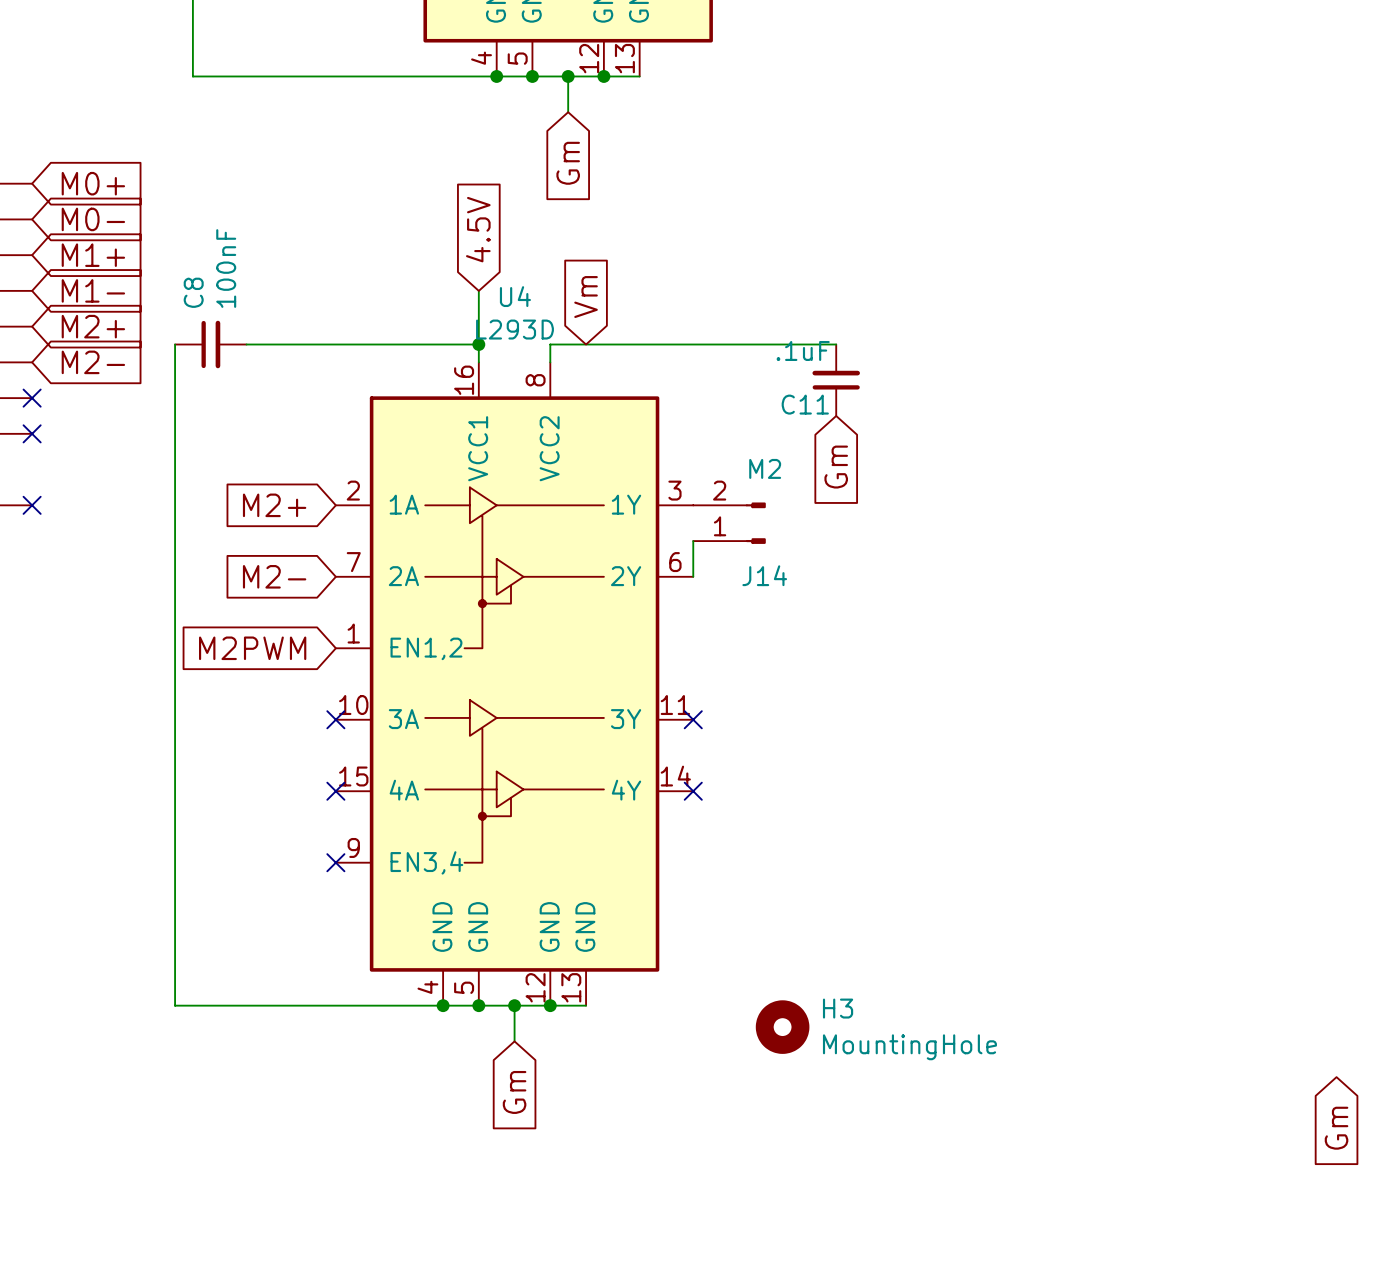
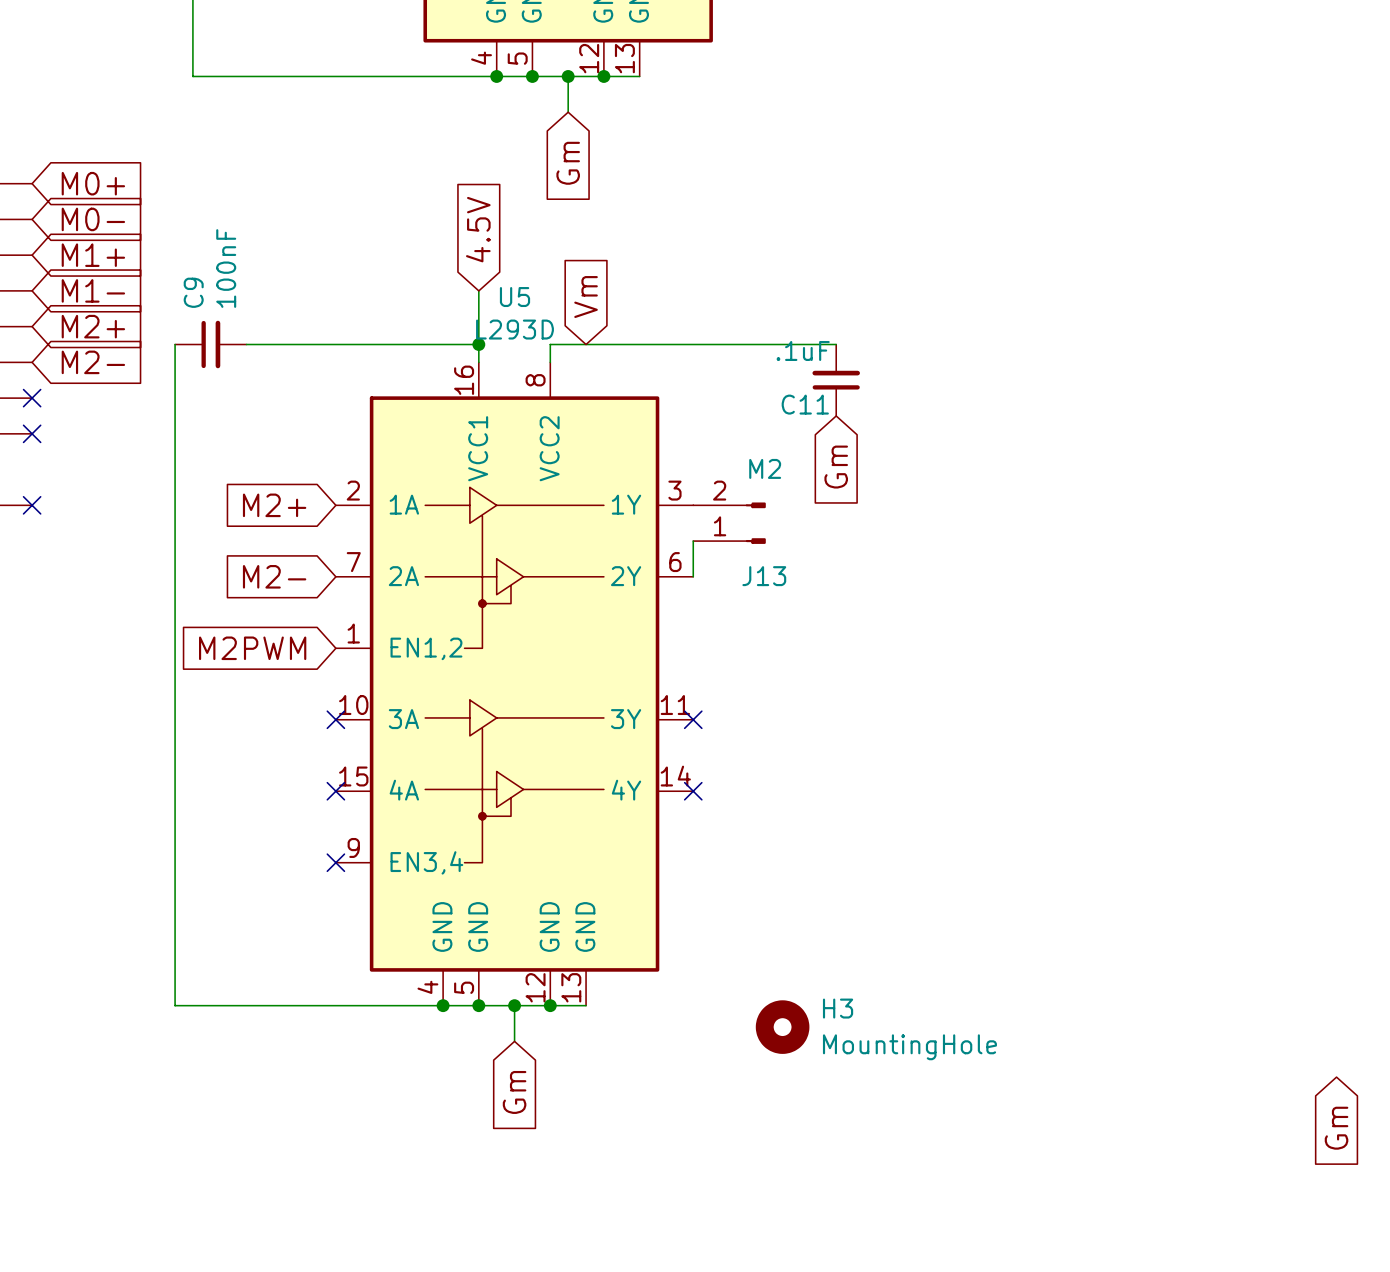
C8 name: C8 (193, 292) -> C9 (193, 292)
U4 name: U4 (515, 296) -> U5 (514, 297)
J14 name: J14 (764, 575) -> J13 (764, 576)

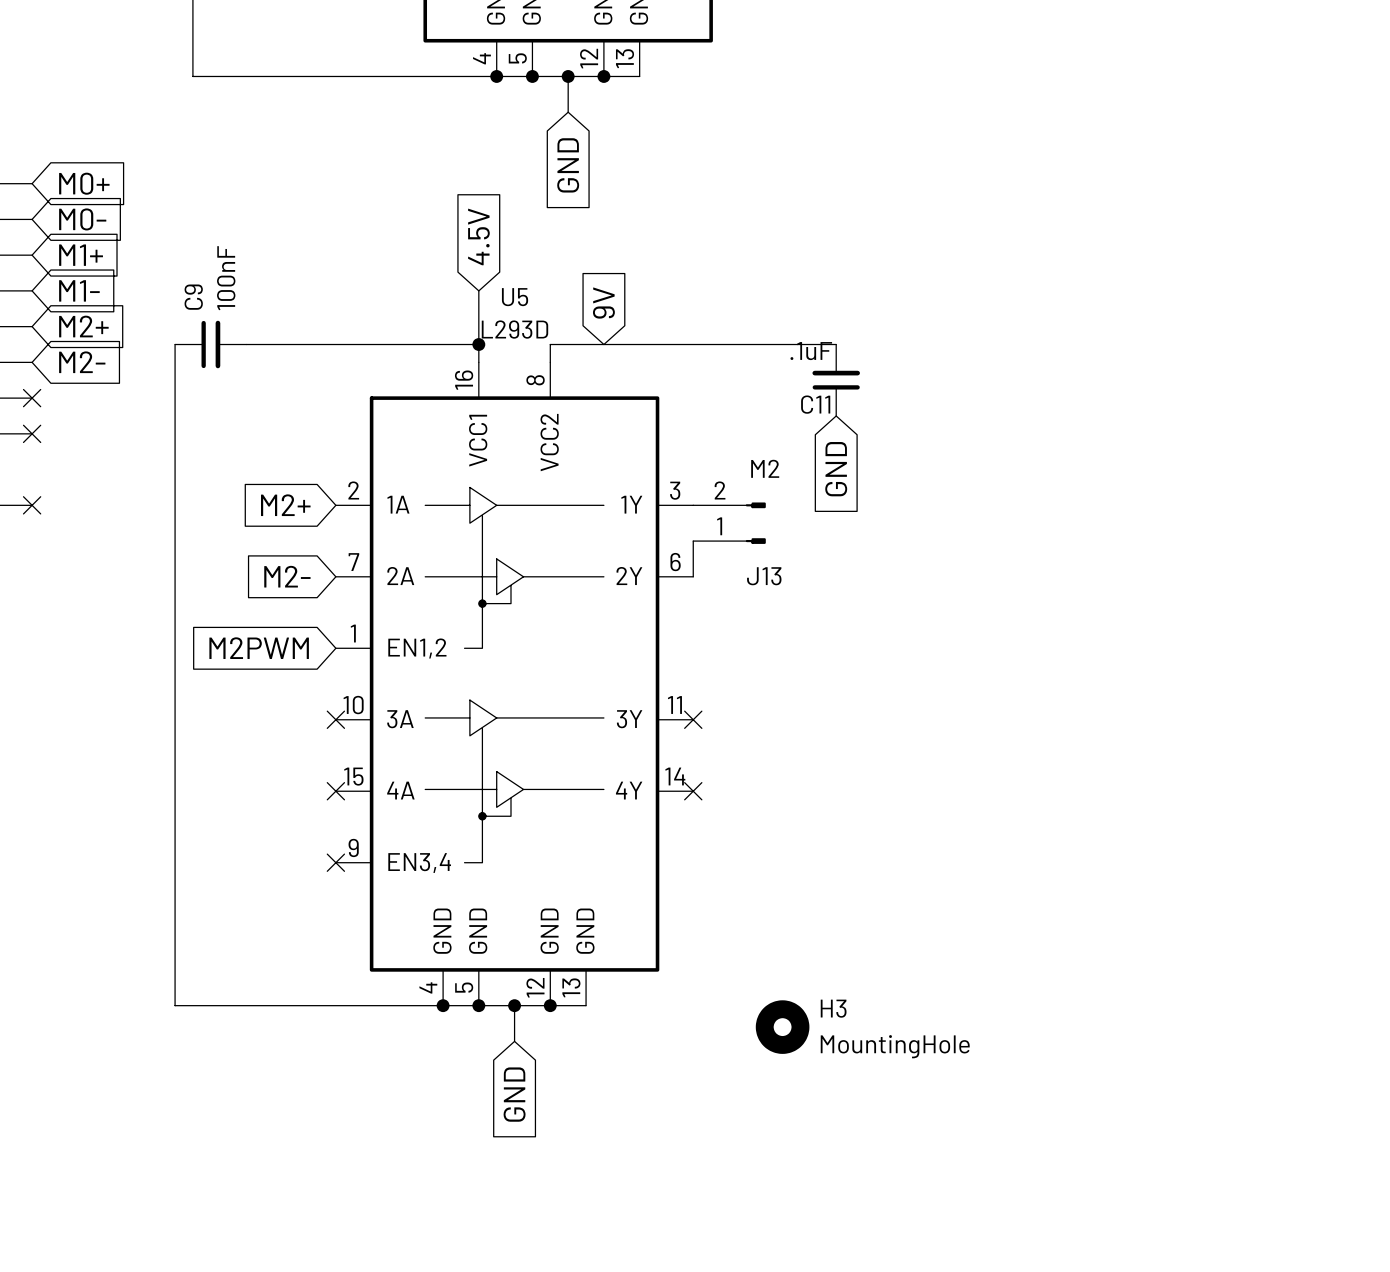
global label: Gm (568, 163) -> GND (568, 165)
global label: Vm (586, 297) -> none
global label: none -> 9V (603, 303)
global label: Gm (836, 467) -> GND (836, 469)
global label: Gm (514, 1092) -> GND (514, 1094)
global label: Gm (1336, 1128) -> none

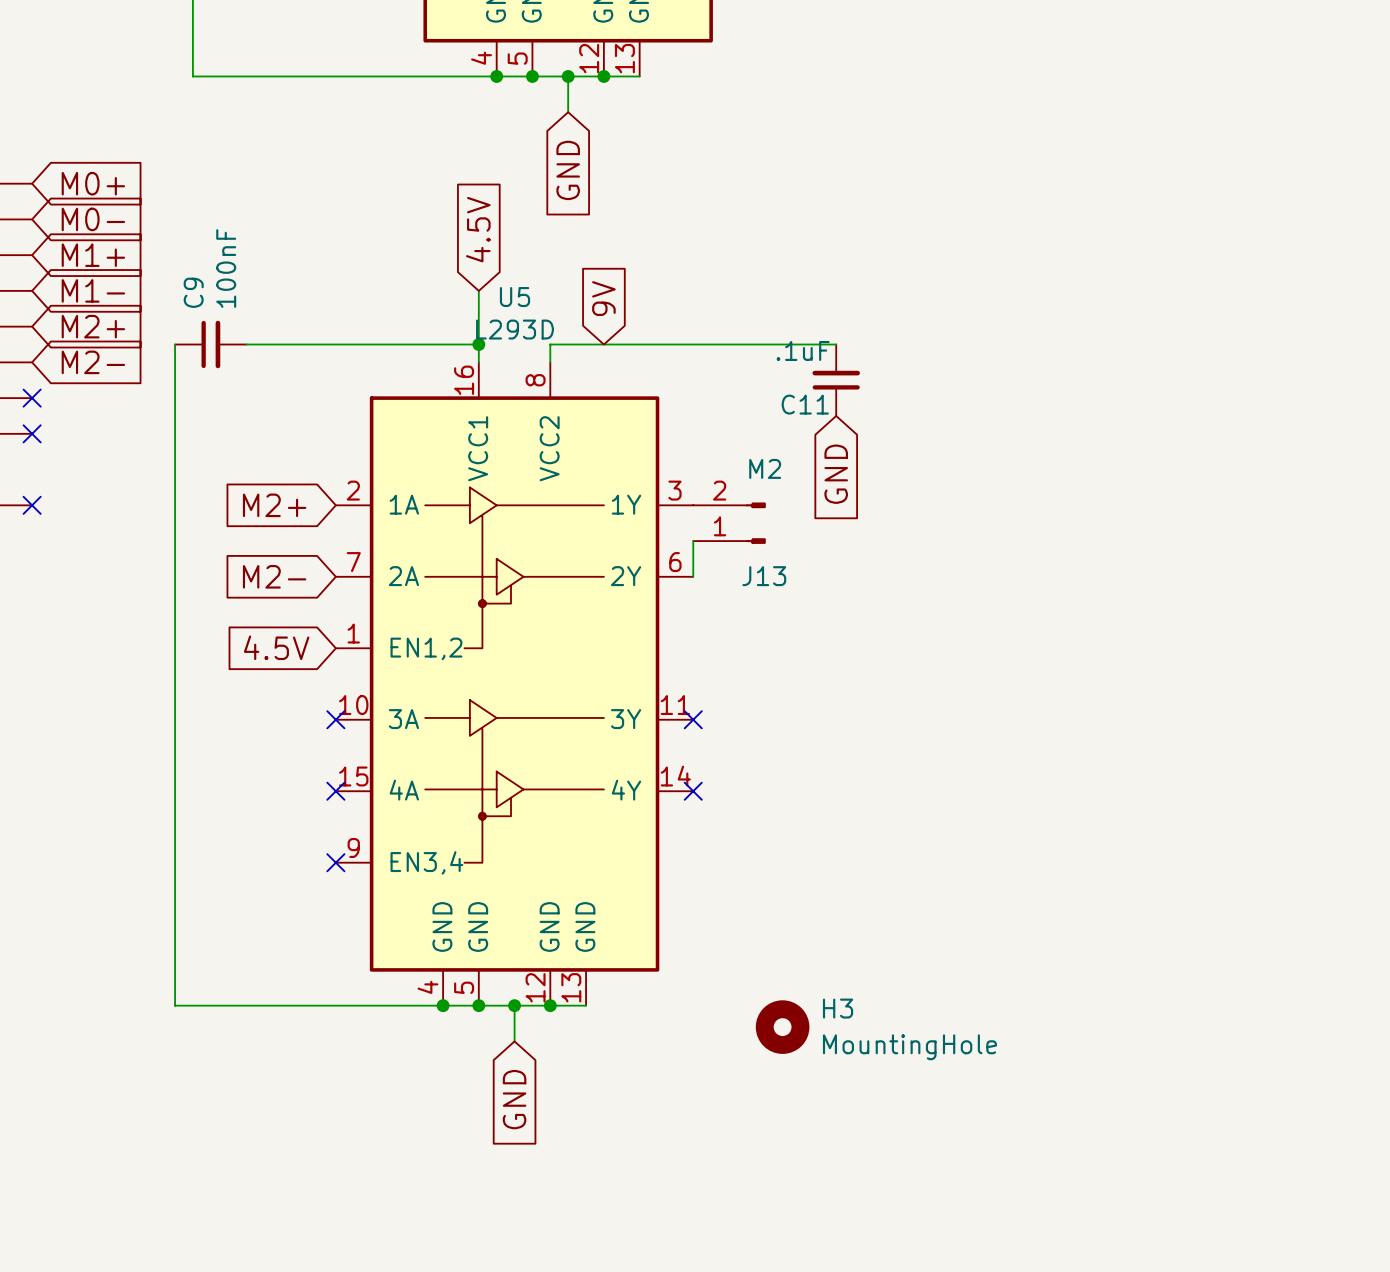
global label: M2PWM (259, 648) -> 4.5V (276, 647)

